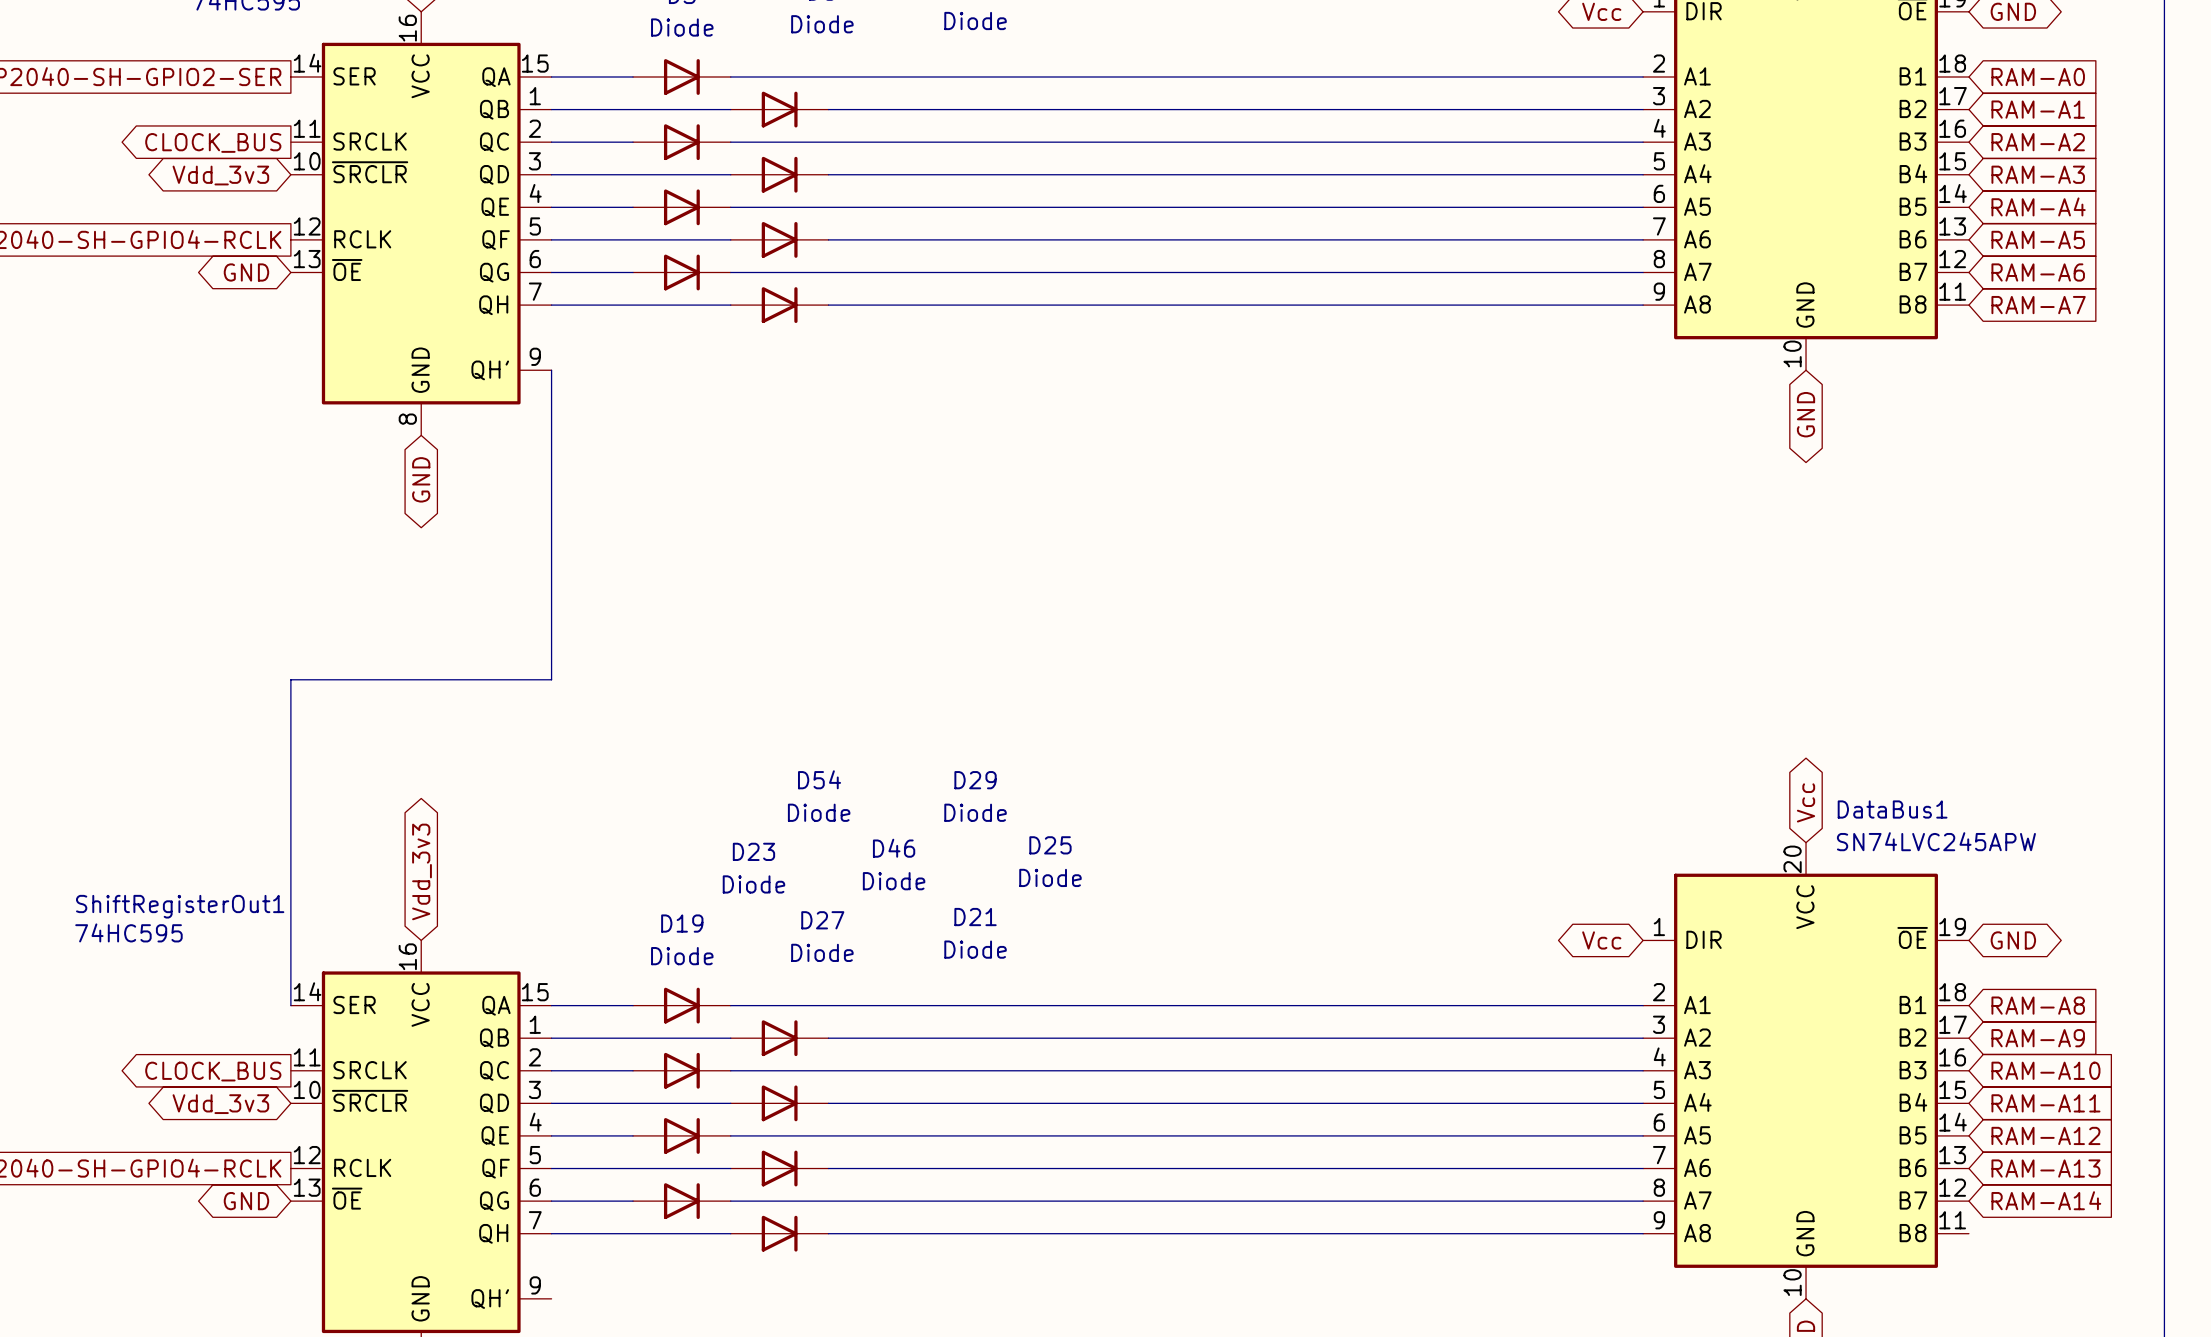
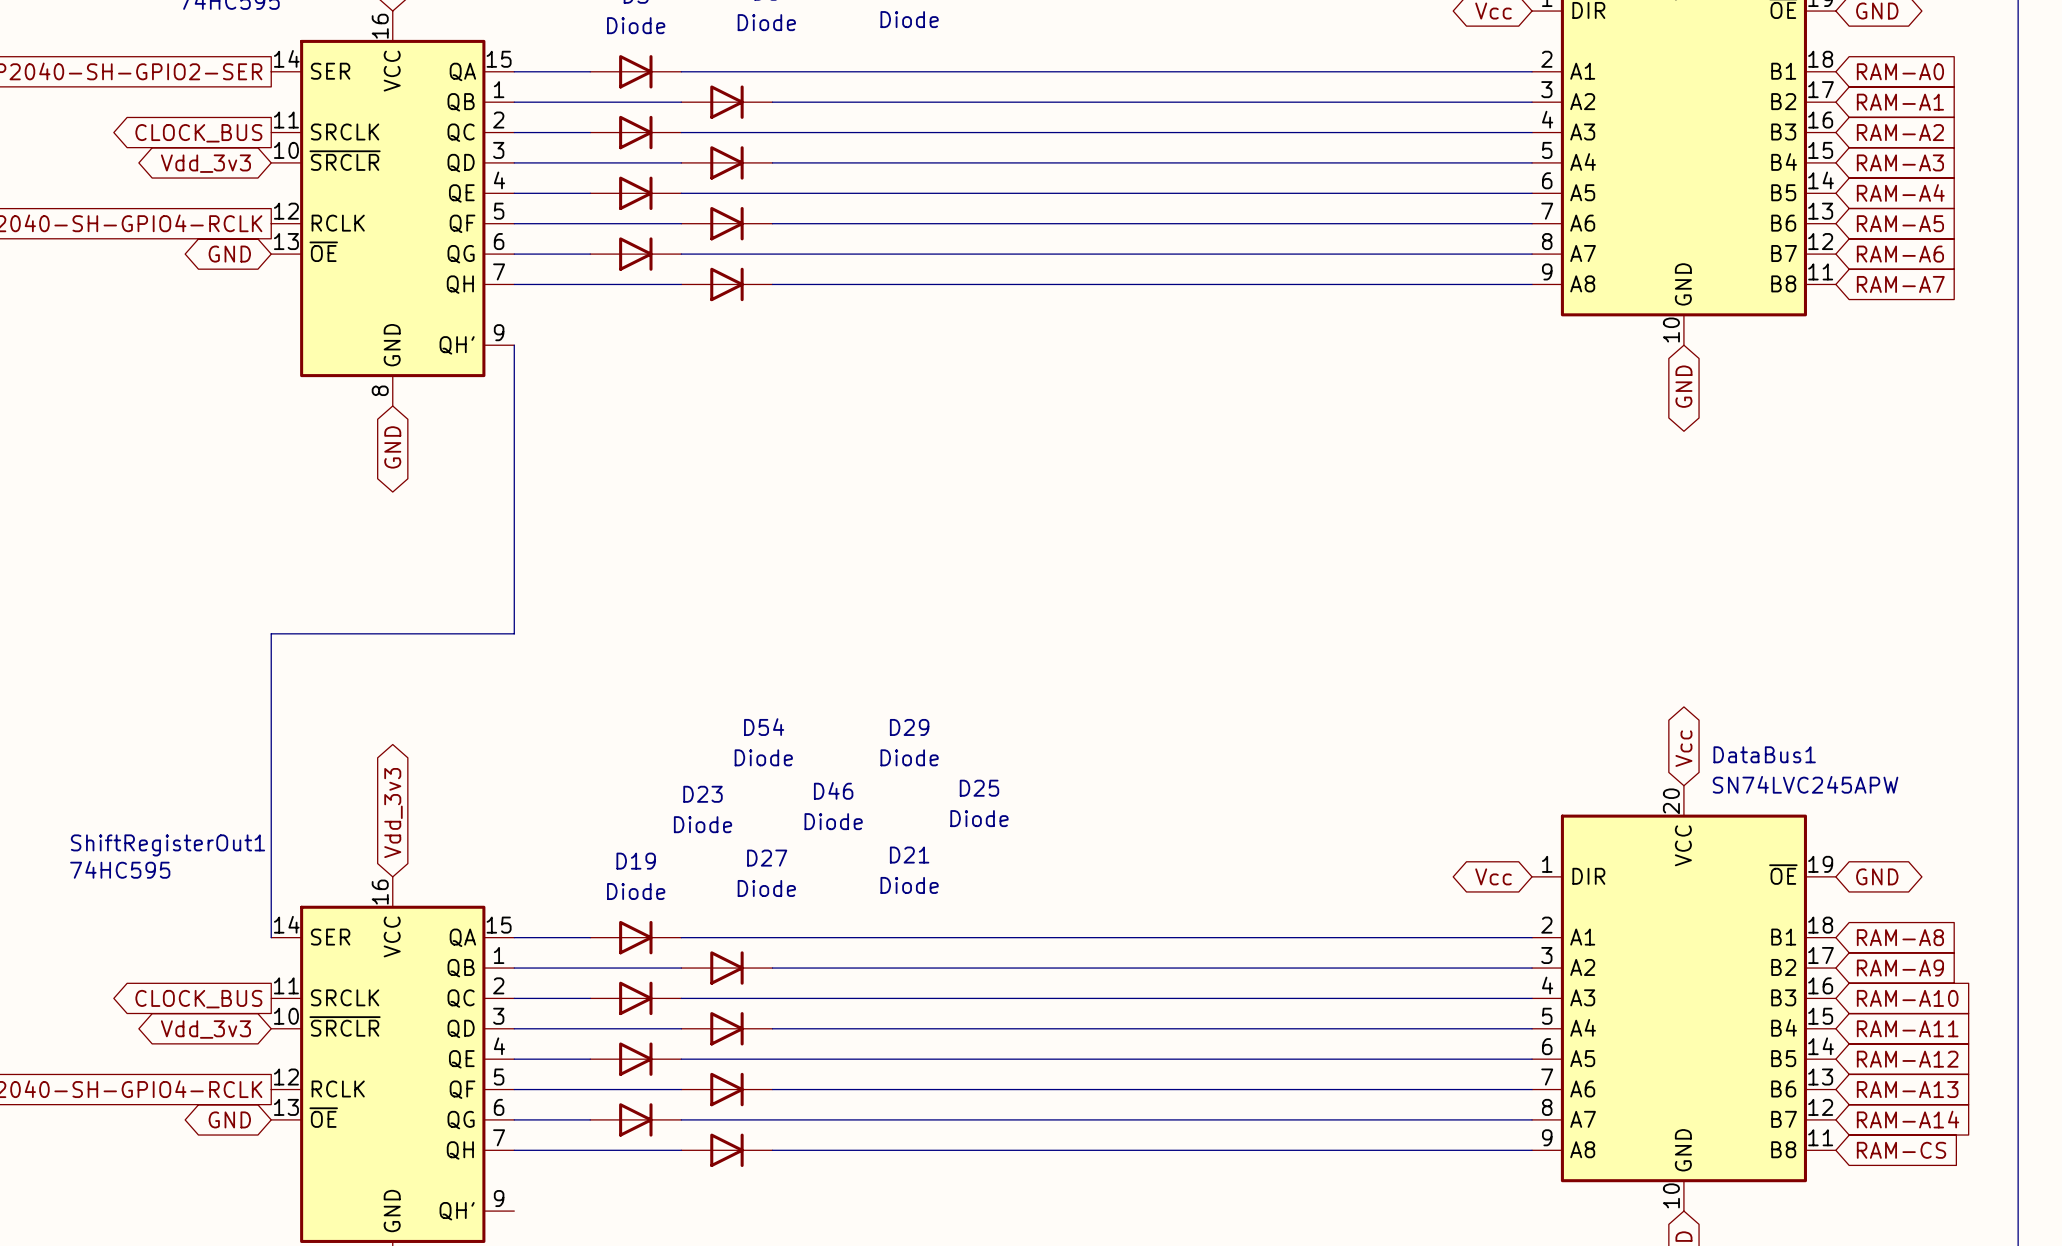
global label: none -> RAM-CS (1901, 1150)

